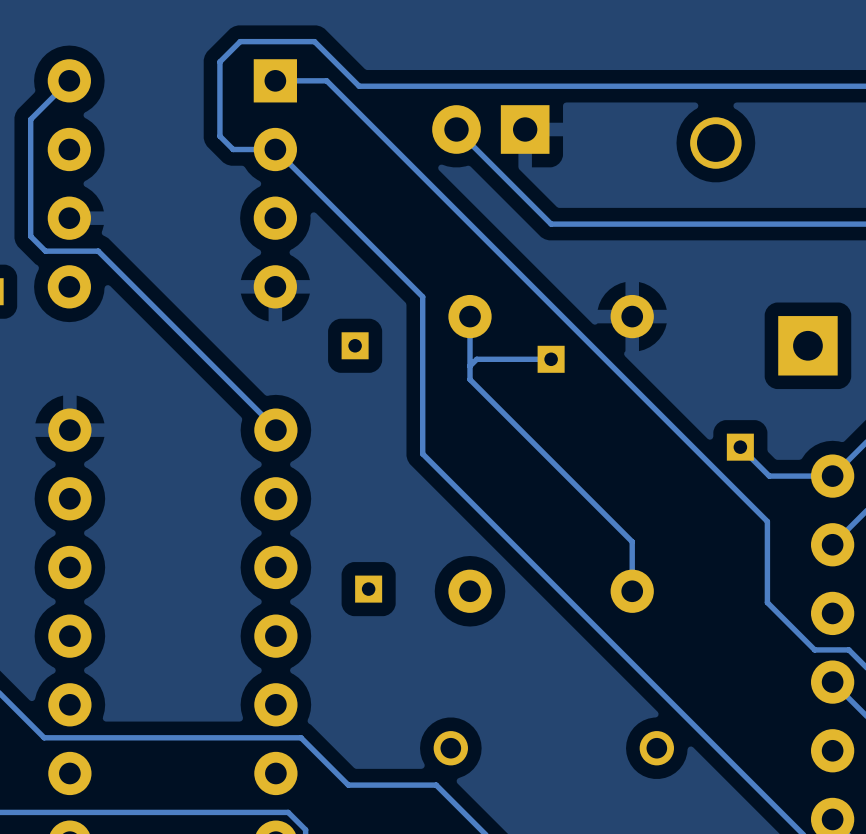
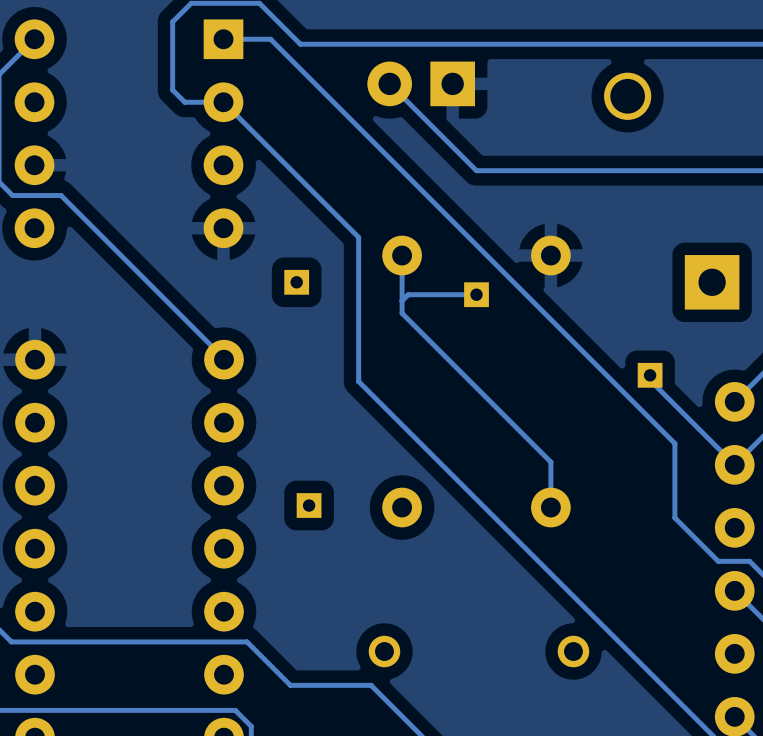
track: (740, 447) (769, 476) (832, 476) -> (650, 375) (650, 380) (734, 464)

